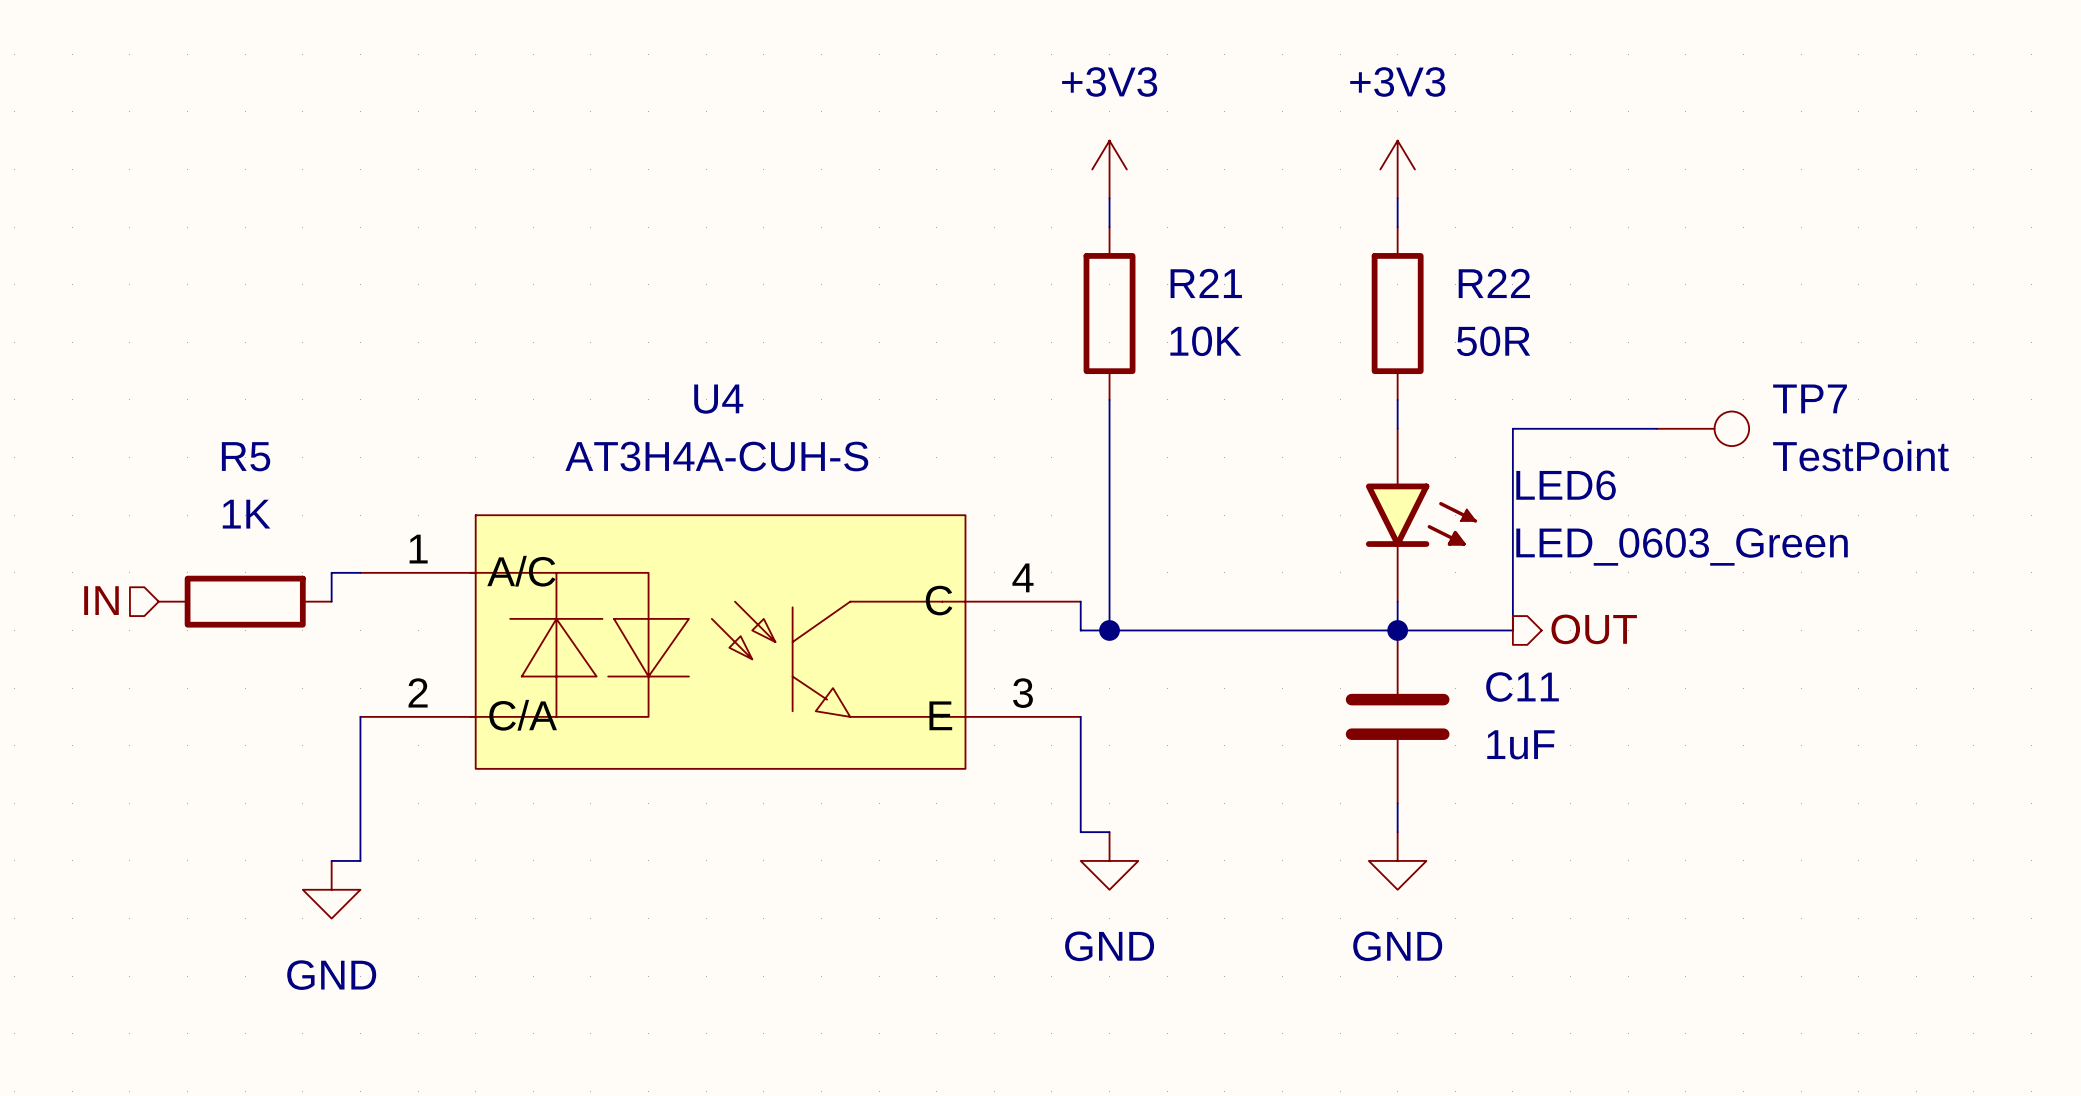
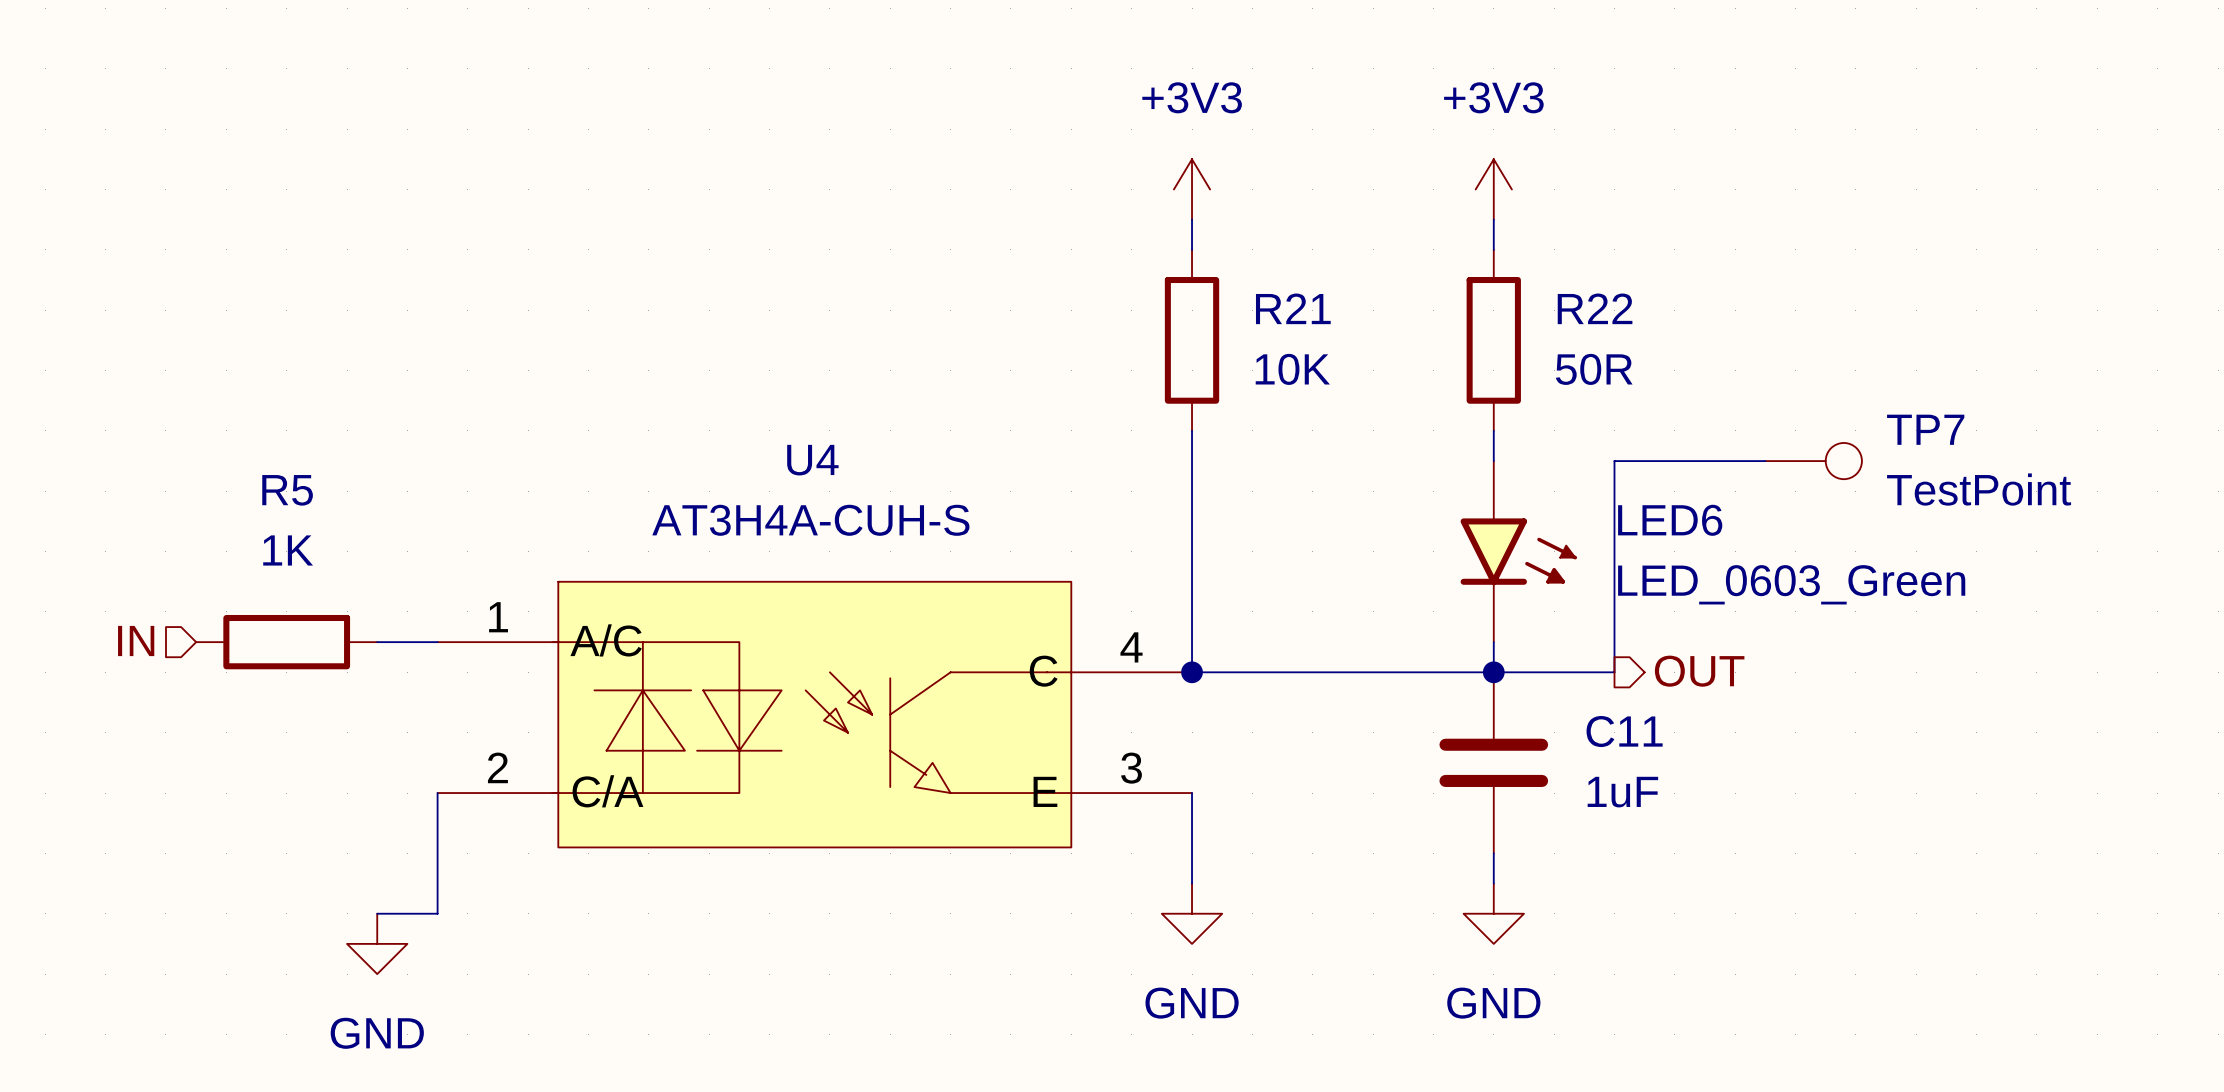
wire: (360, 572) (331, 572) (331, 601) -> (437, 642) (377, 642)
wire: (1080, 601) (1080, 630) (1109, 630) -> none
U4 position: (720, 642) -> (814, 714)
wire: (360, 716) (360, 860) -> (437, 793) (437, 913) (407, 913)
wire: (1080, 716) (1080, 832) (1109, 832) -> (1192, 793) (1192, 883)

